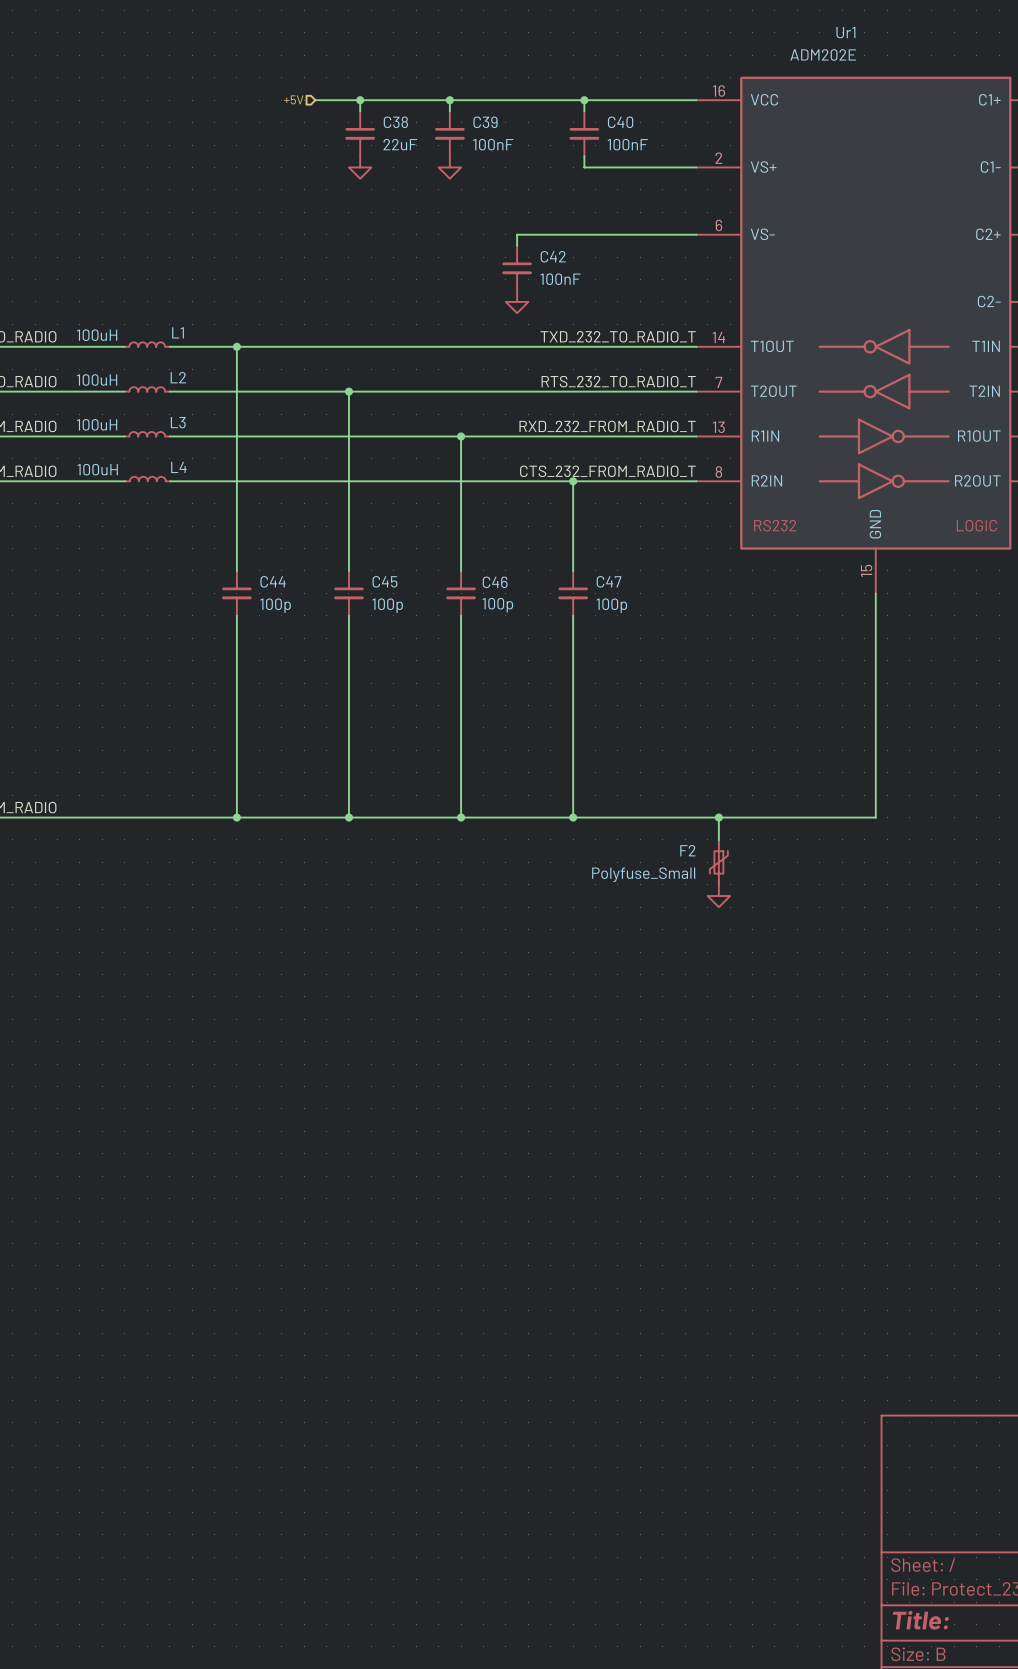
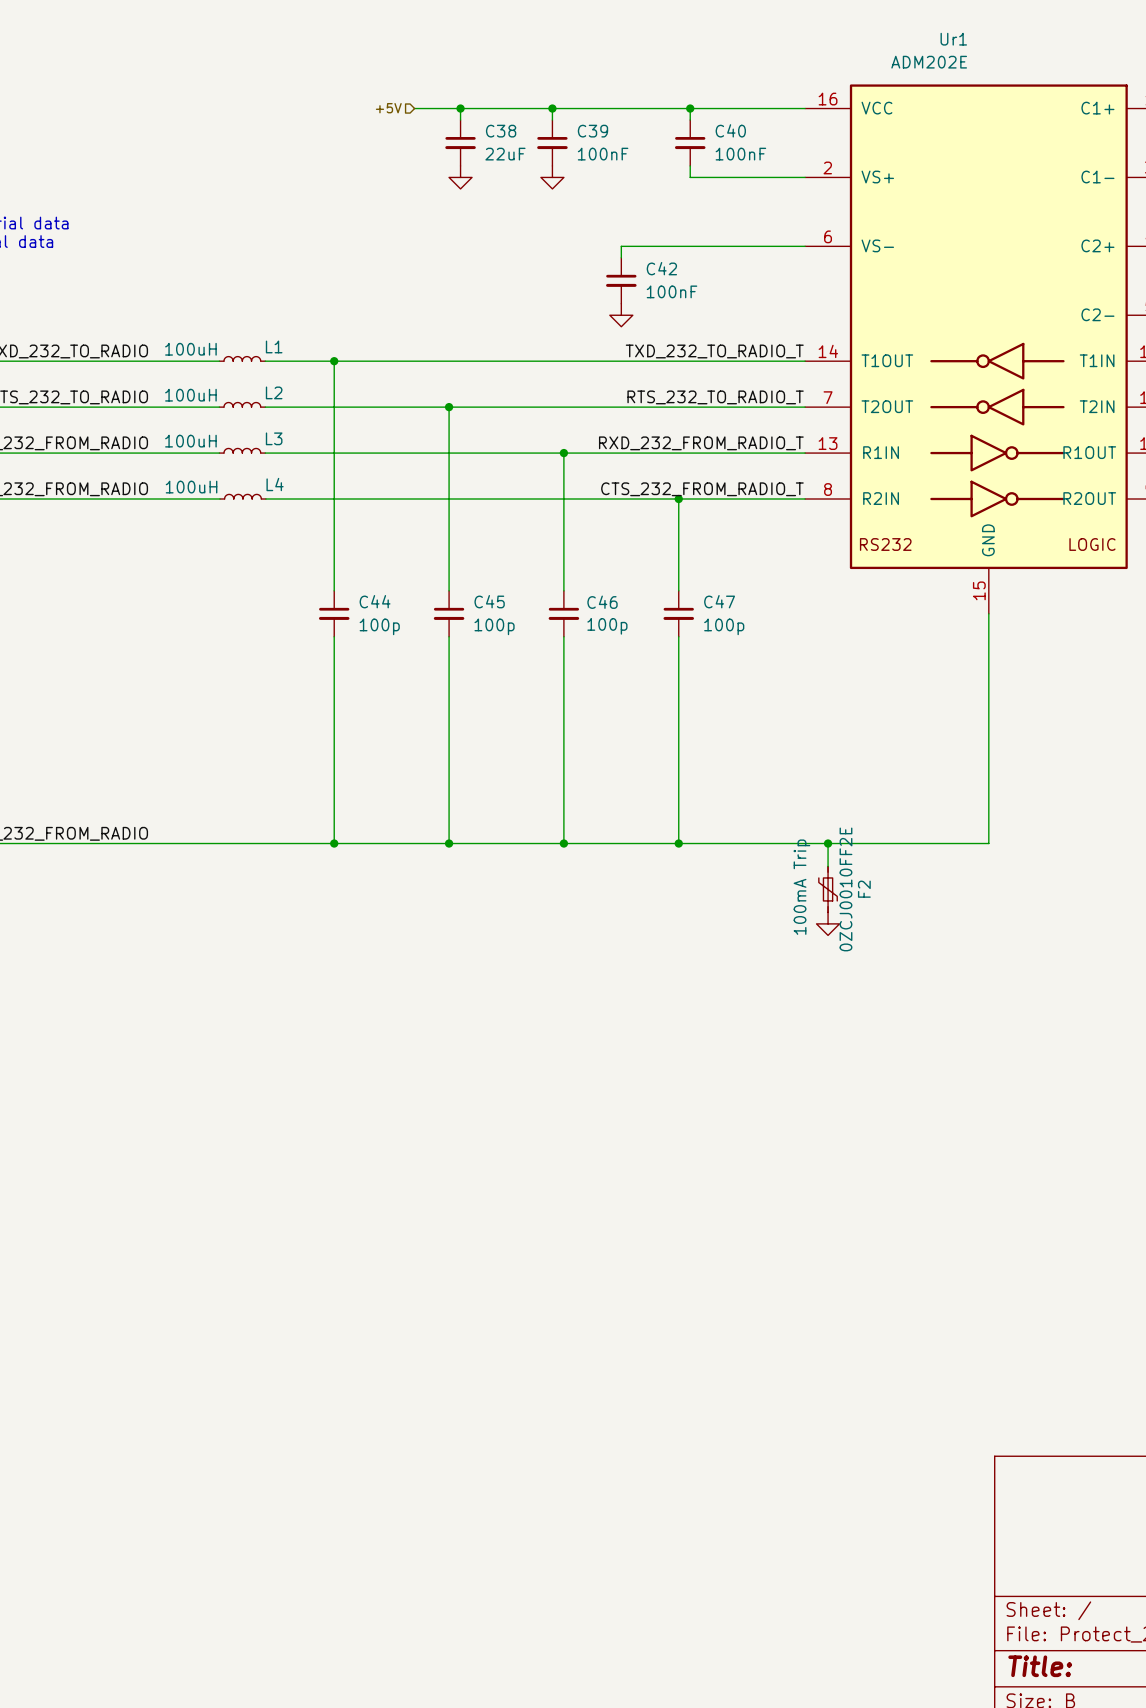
F2 text: none -> 100mA Trip (801, 887)
F2 flip: as is (718, 862) -> left-right (828, 889)
F2 value: Polyfuse_Small (643, 874) -> 0ZCJ0010FF2E (845, 889)

